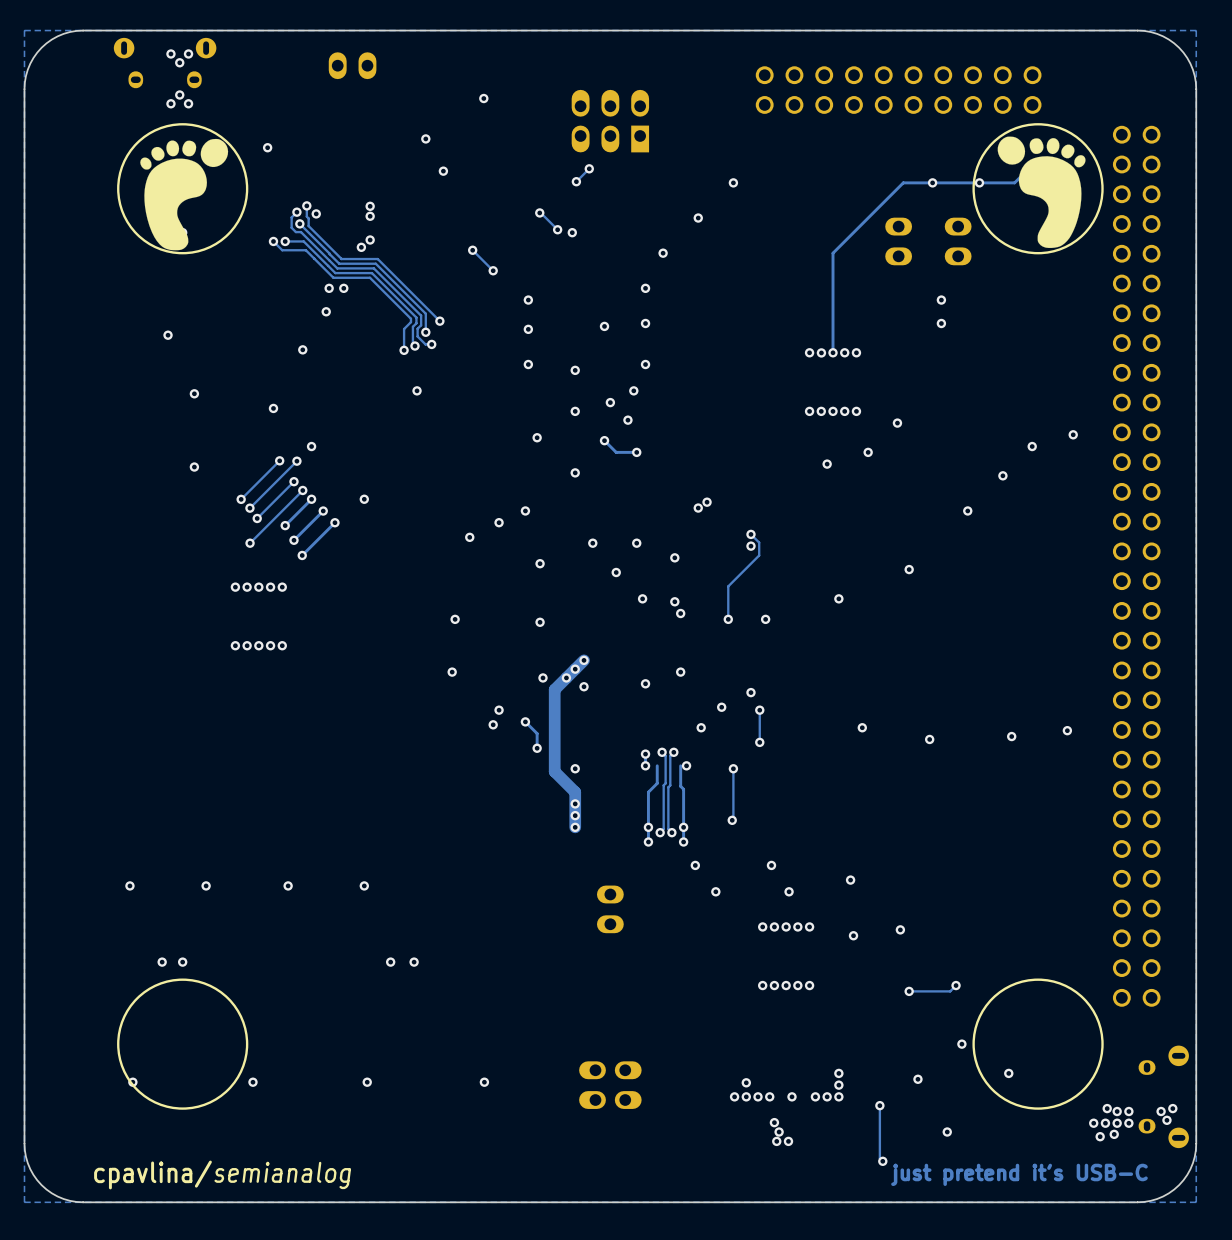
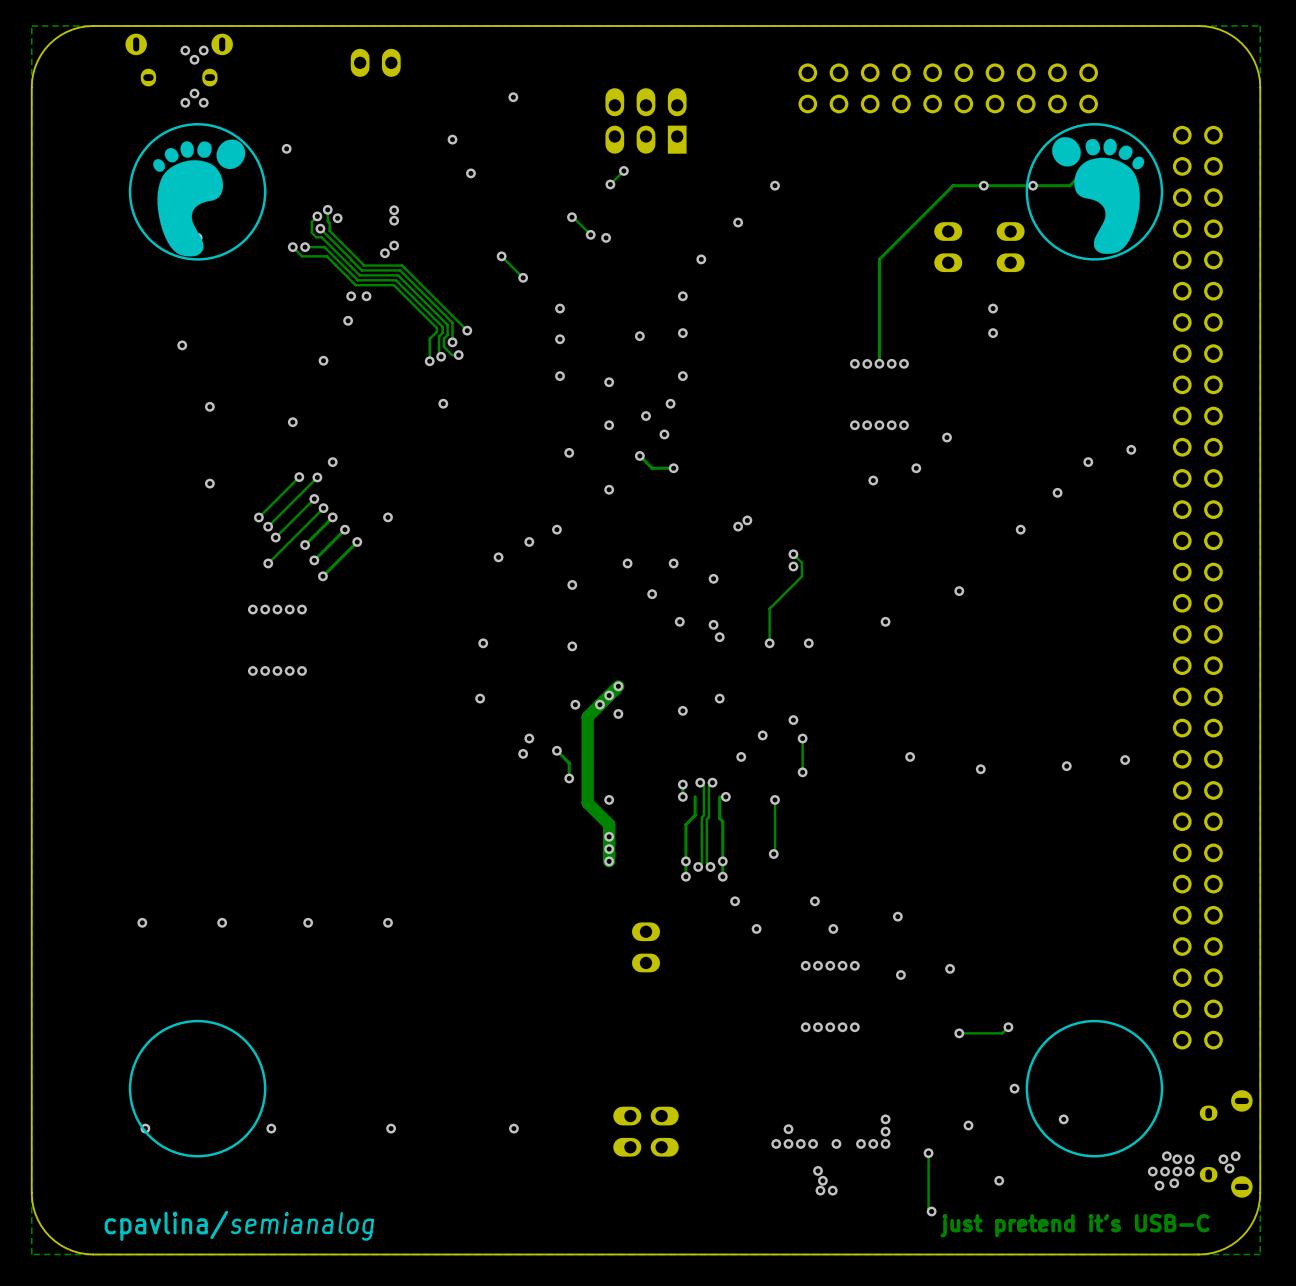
via: (162, 962) -> none
via: (182, 962) -> none
via: (390, 962) -> none
via: (414, 962) -> none

